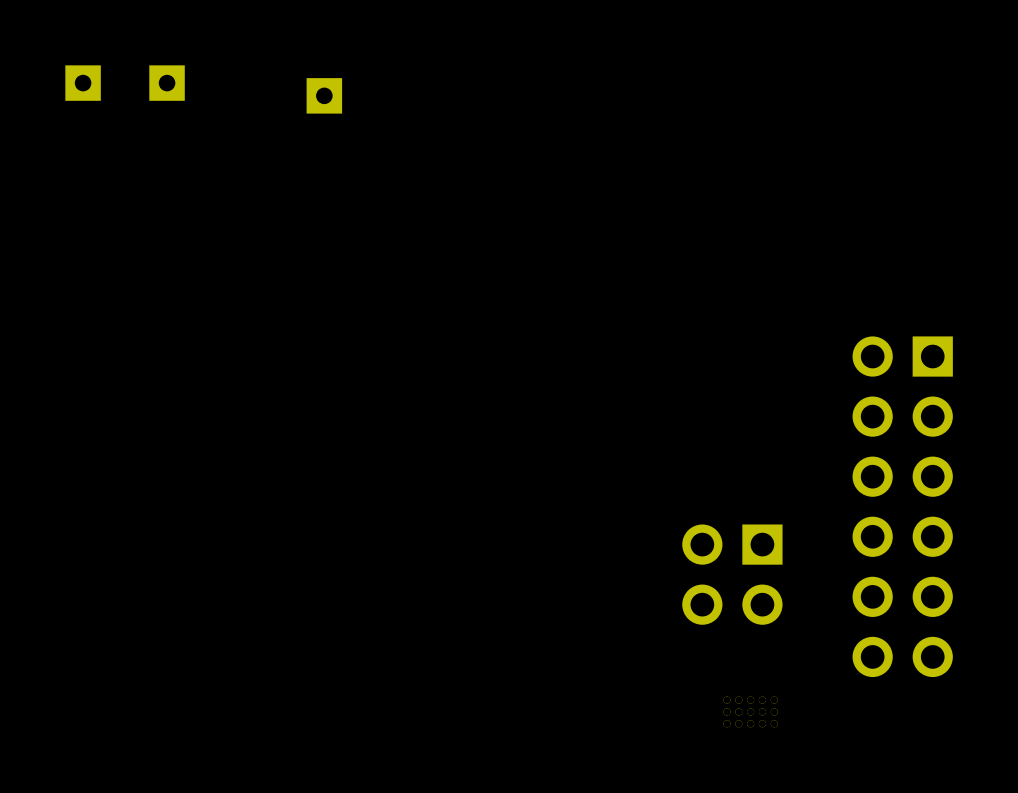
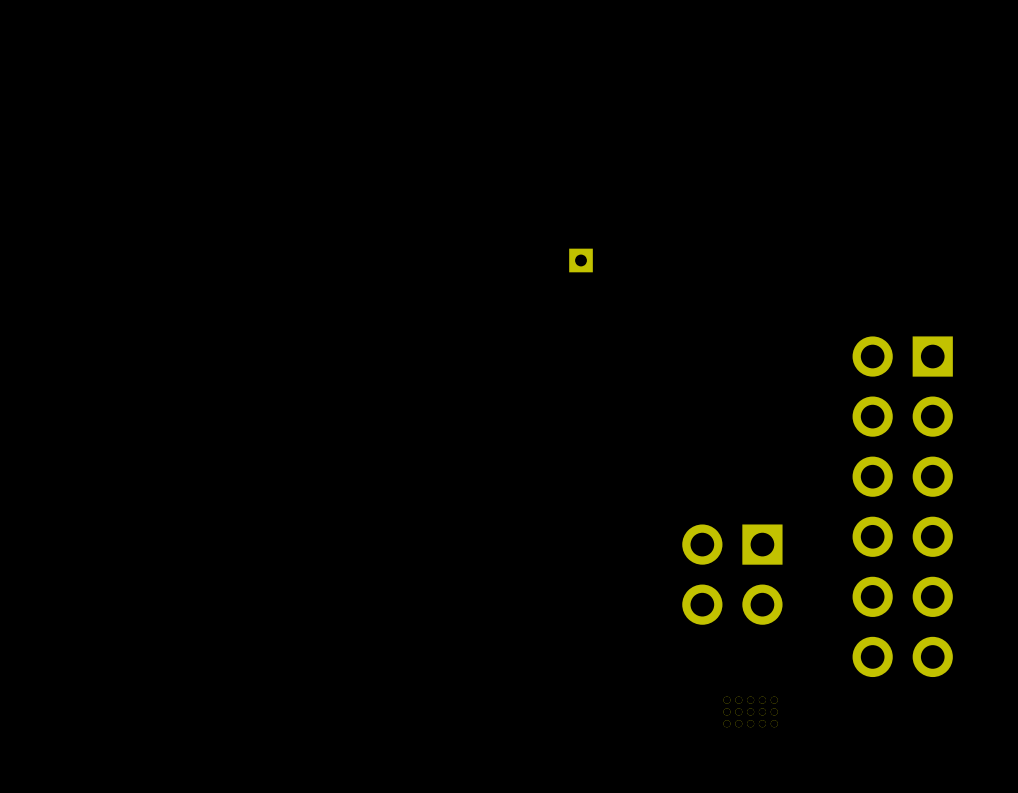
part: (83, 83) -> none
part: (167, 83) -> none
part: (324, 95) -> none
part: none -> (581, 260)

